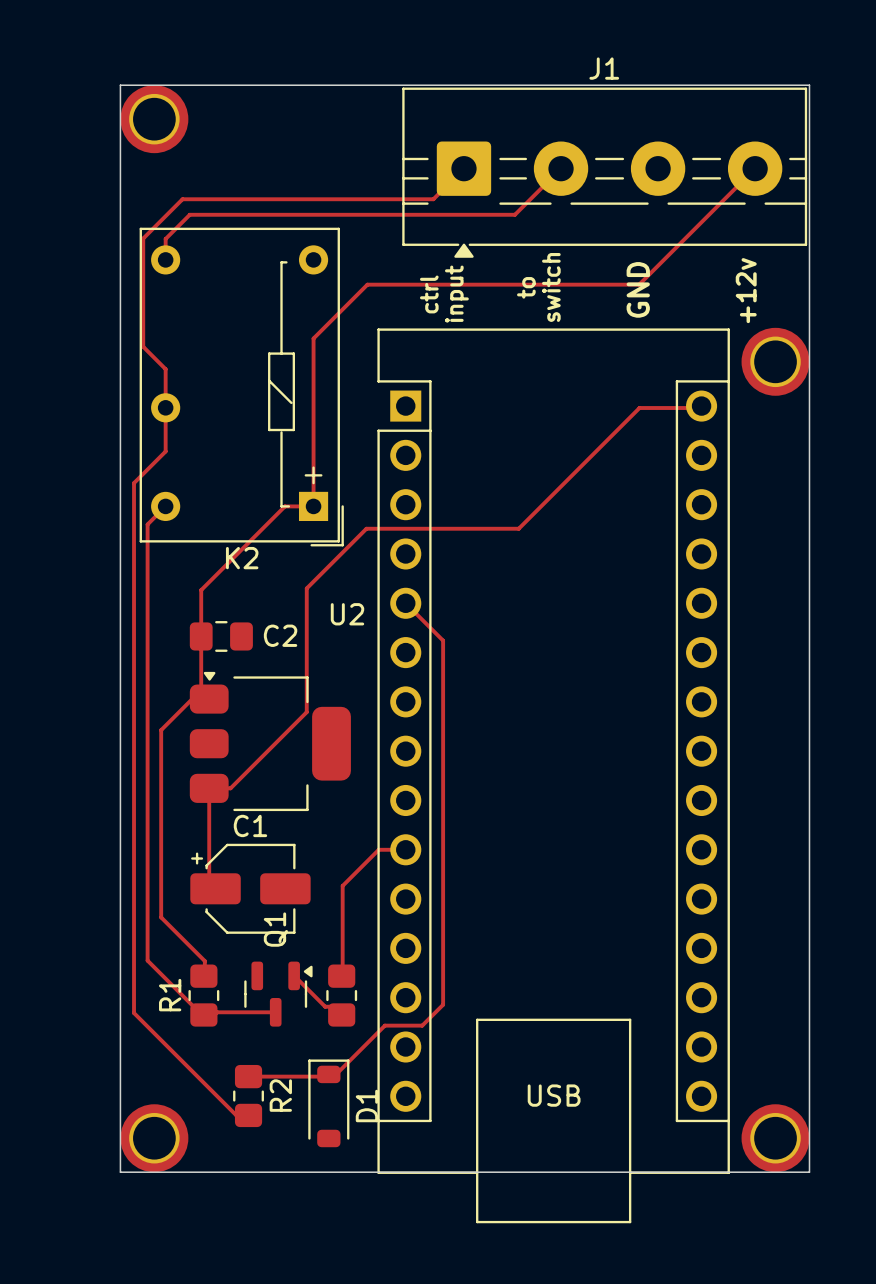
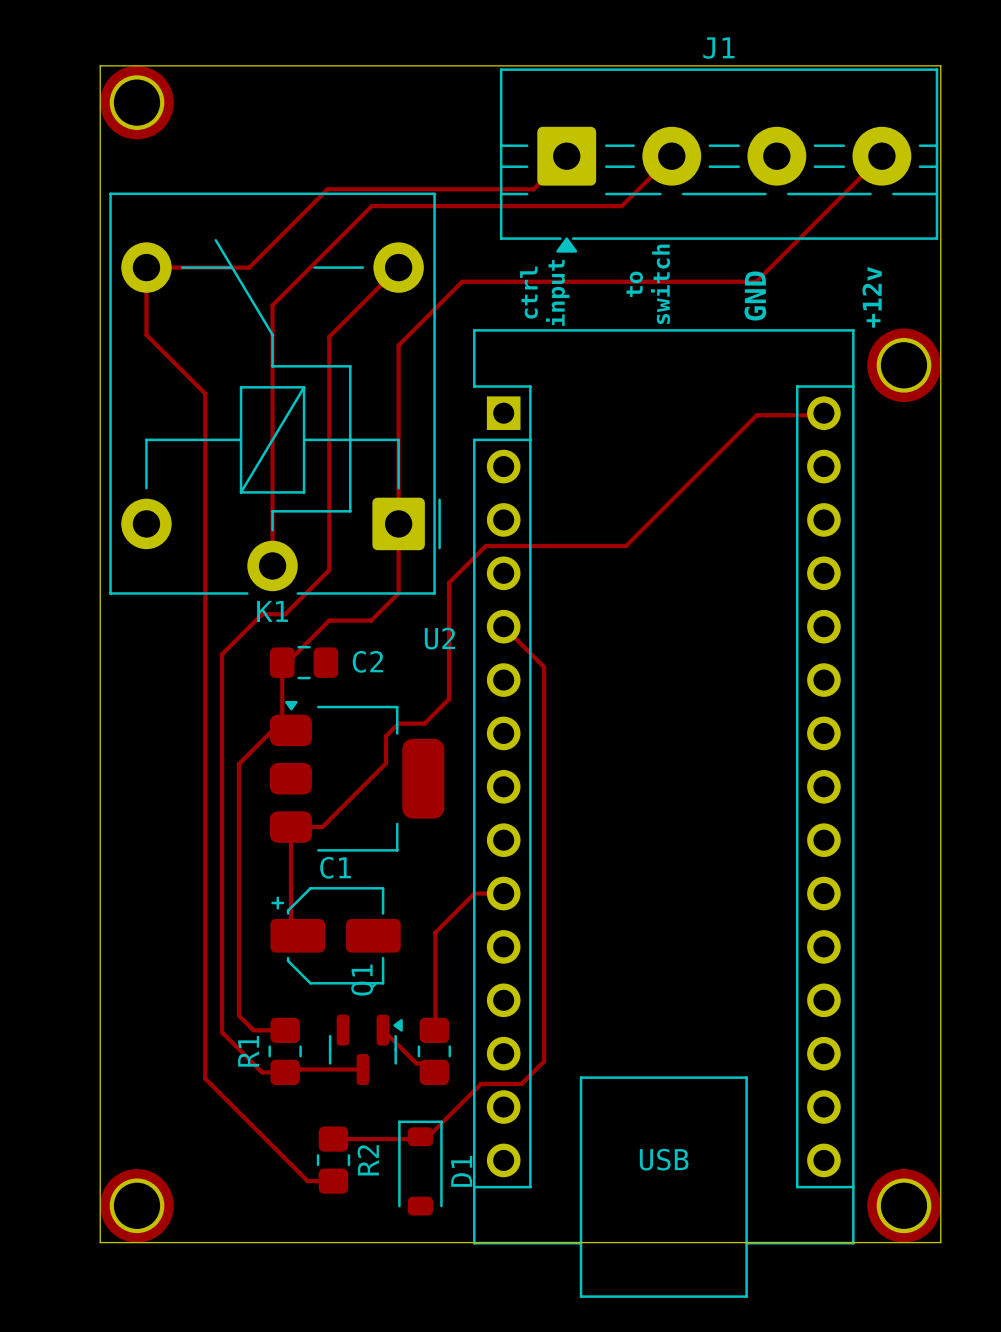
board edge: (120, 85) (120, 1172) -> (194, 65) (100, 65) (100, 1242) (194, 1242)
part position: (154, 119) -> (137, 102)
track: (243, 199) (182, 199) (143, 238) (143, 346) (165, 369) (165, 451) (134, 483) (134, 1013) (236, 1115) -> (327, 189) (249, 267) (146, 267) (146, 334) (205, 393) (205, 1078) (307, 1181) (320, 1181)
track: (283, 214) (189, 214) (165, 238) (165, 259) -> (371, 206) (272, 305) (272, 565)
track: (313, 338) (313, 506) (284, 506) (201, 590) (201, 636) -> (403, 340) (398, 345) (398, 593) (371, 620) (329, 620) (287, 662) (282, 662)
K2: (241, 387) -> none
K1: none -> (275, 393)
track: (165, 506) (147, 524) (147, 960) (203, 1014) -> (398, 267) (329, 336) (329, 570) (285, 614) (262, 614) (222, 654) (222, 1032) (262, 1072) (285, 1072)
track: (389, 528) (366, 528) (306, 588) (306, 712) (230, 788) -> (485, 546) (449, 582) (449, 699) (424, 723) (398, 723) (386, 736) (386, 763) (322, 827) (314, 827)
track: (161, 917) (204, 961) (203, 976) -> (238, 966) (238, 1015) (253, 1030) (285, 1030)
part position: (154, 1138) -> (137, 1205)

